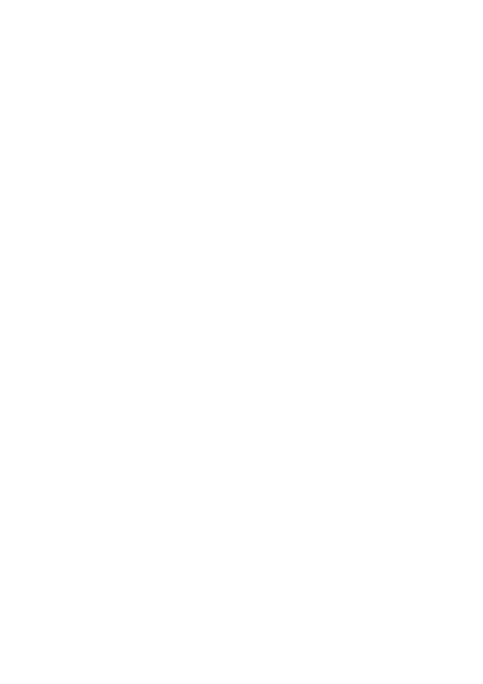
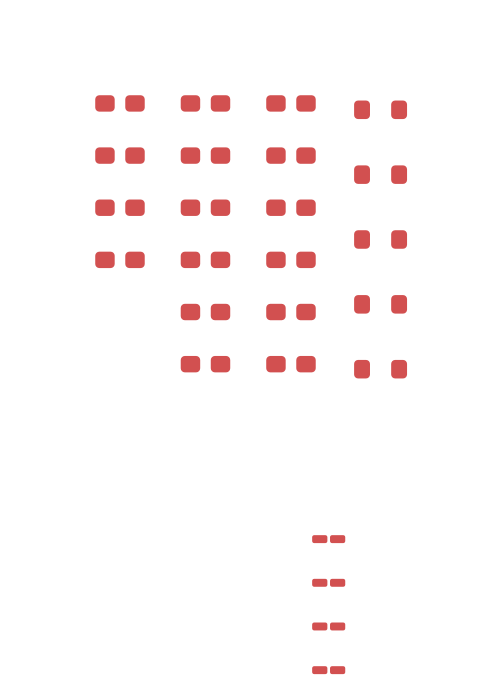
part: none -> (119, 103)
part: none -> (205, 103)
part: none -> (290, 103)
part: none -> (380, 109)
part: none -> (119, 155)
part: none -> (205, 155)
part: none -> (290, 155)
part: none -> (380, 174)
part: none -> (119, 207)
part: none -> (205, 207)
part: none -> (290, 207)
part: none -> (380, 239)
part: none -> (119, 259)
part: none -> (205, 259)
part: none -> (290, 259)
part: none -> (380, 304)
part: none -> (205, 312)
part: none -> (290, 312)
part: none -> (205, 364)
part: none -> (290, 364)
part: none -> (380, 369)
part: none -> (328, 539)
part: none -> (328, 582)
part: none -> (328, 626)
part: none -> (328, 670)

